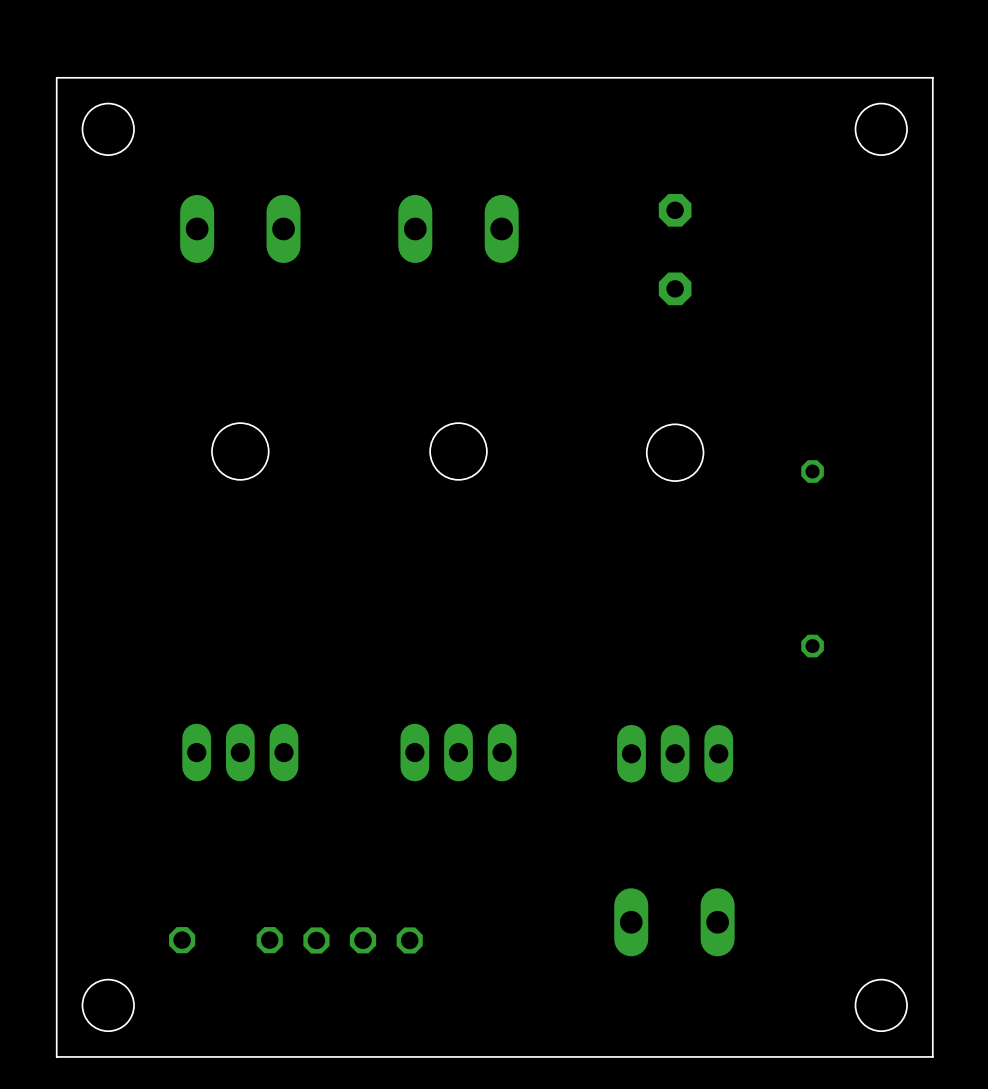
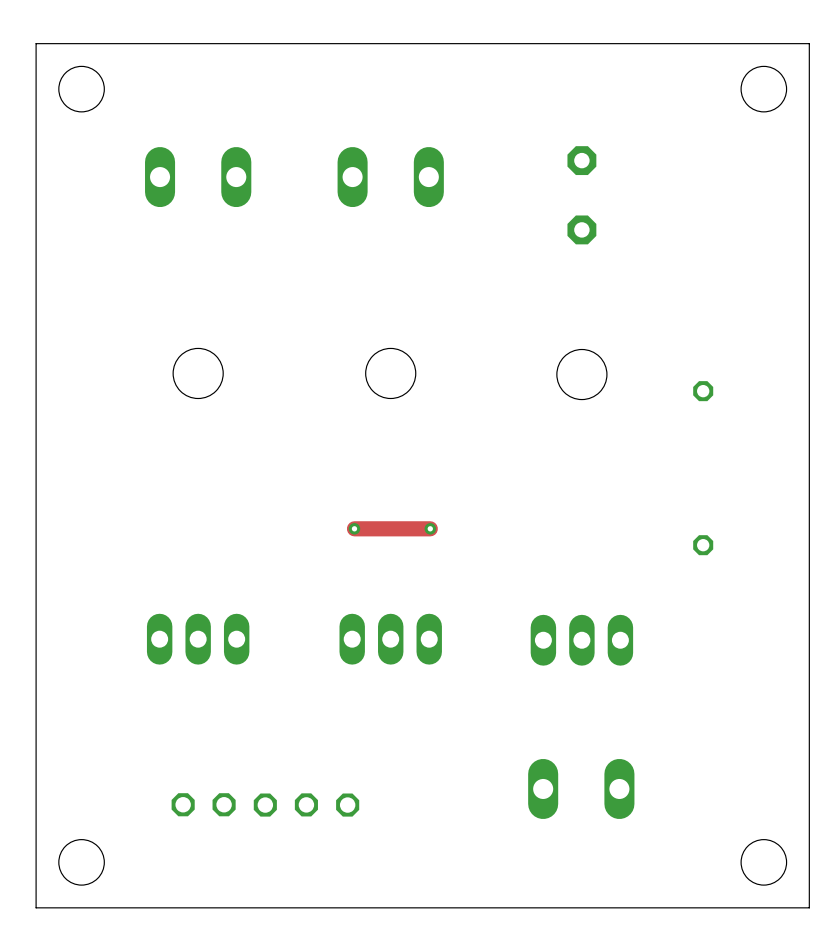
track: none -> (354, 528) (430, 528)
via: none -> (354, 528)
via: none -> (430, 528)
part position: (182, 940) -> (183, 804)

